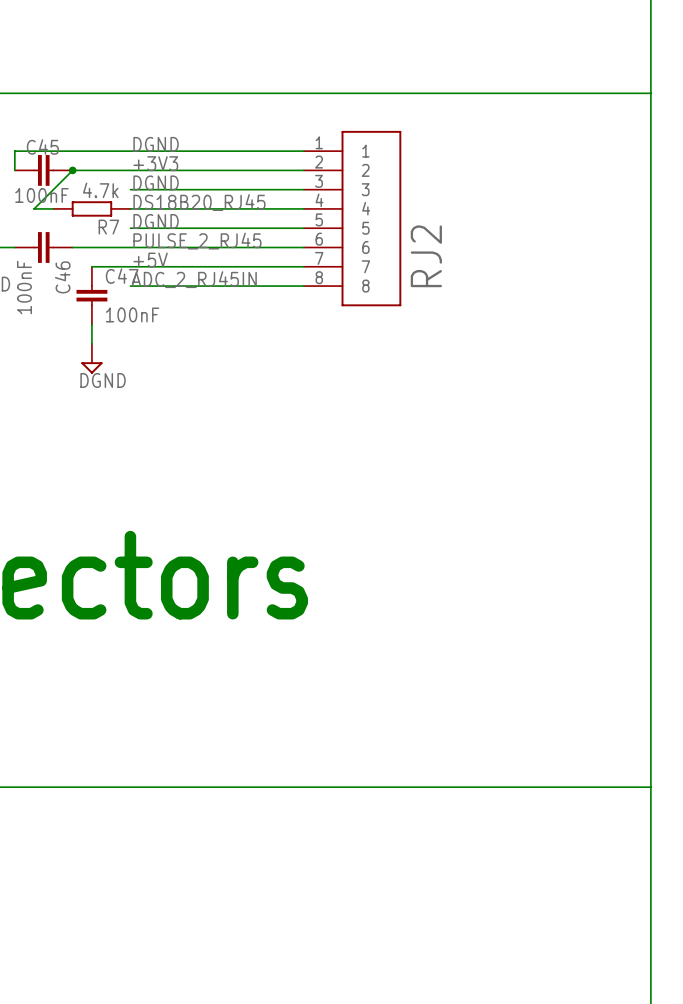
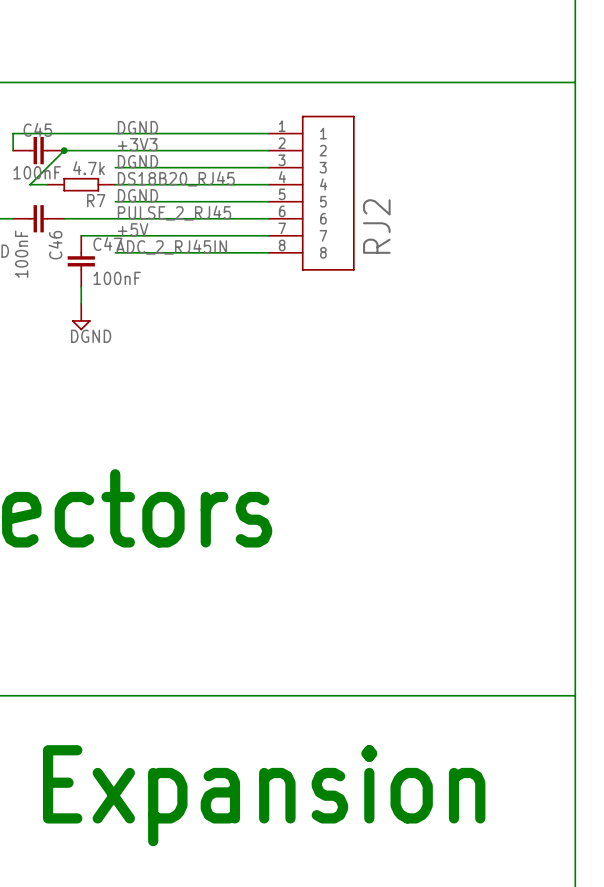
text: none -> Expansion (264, 795)

